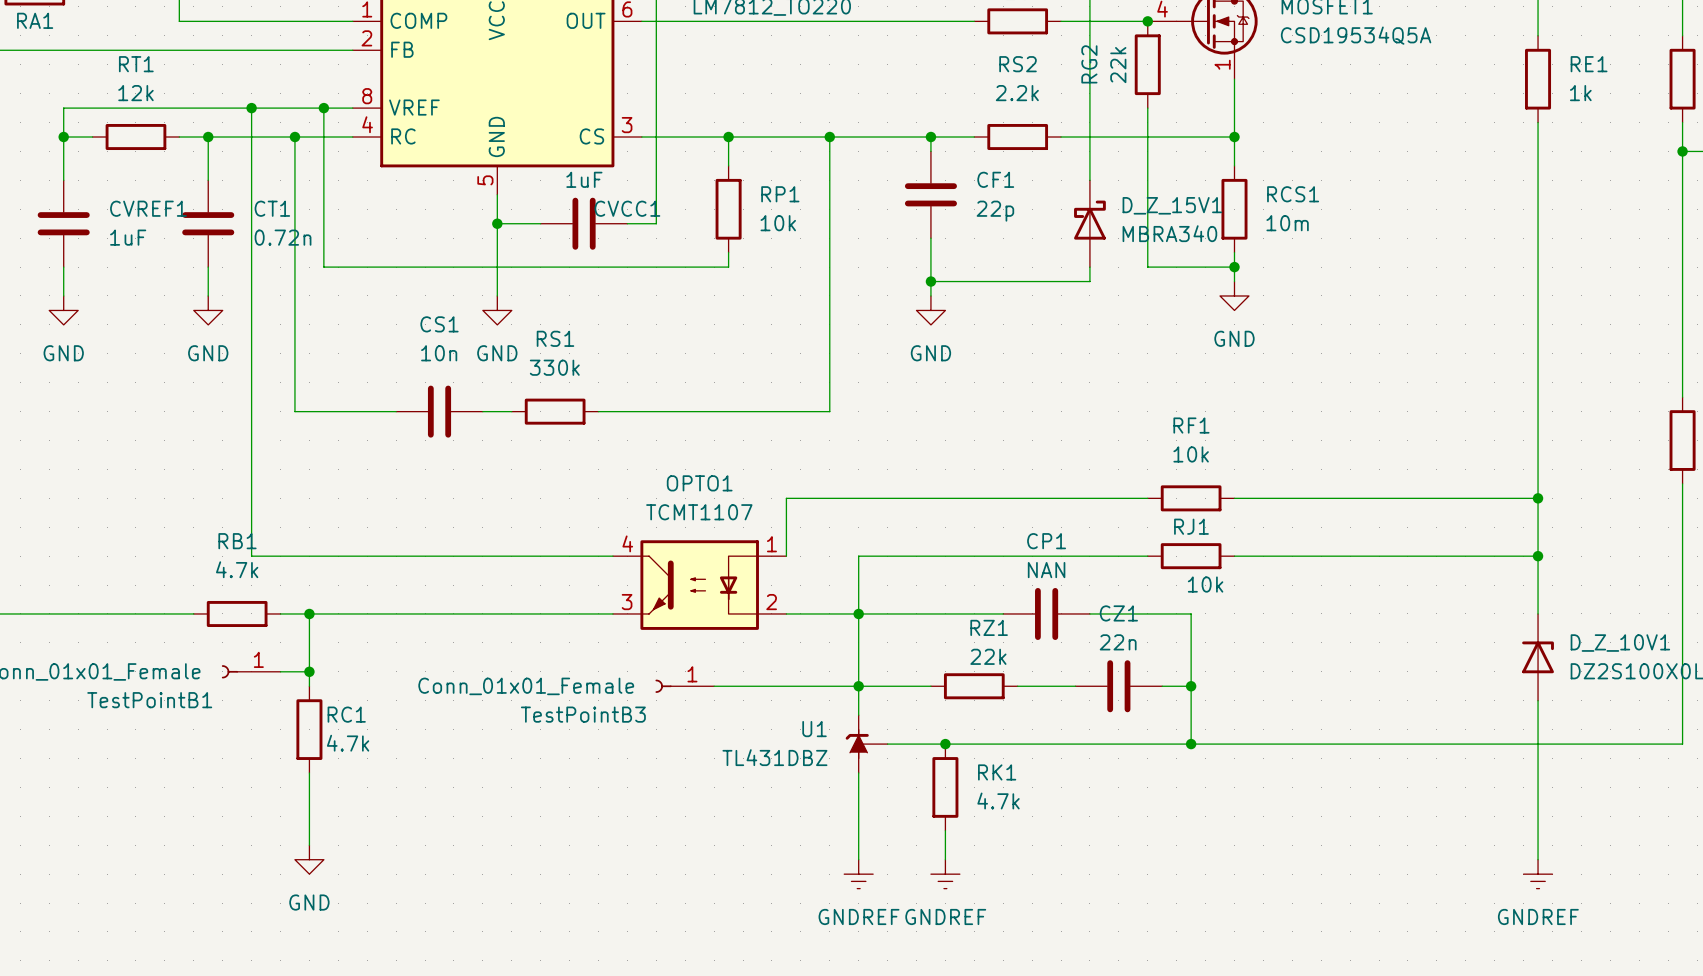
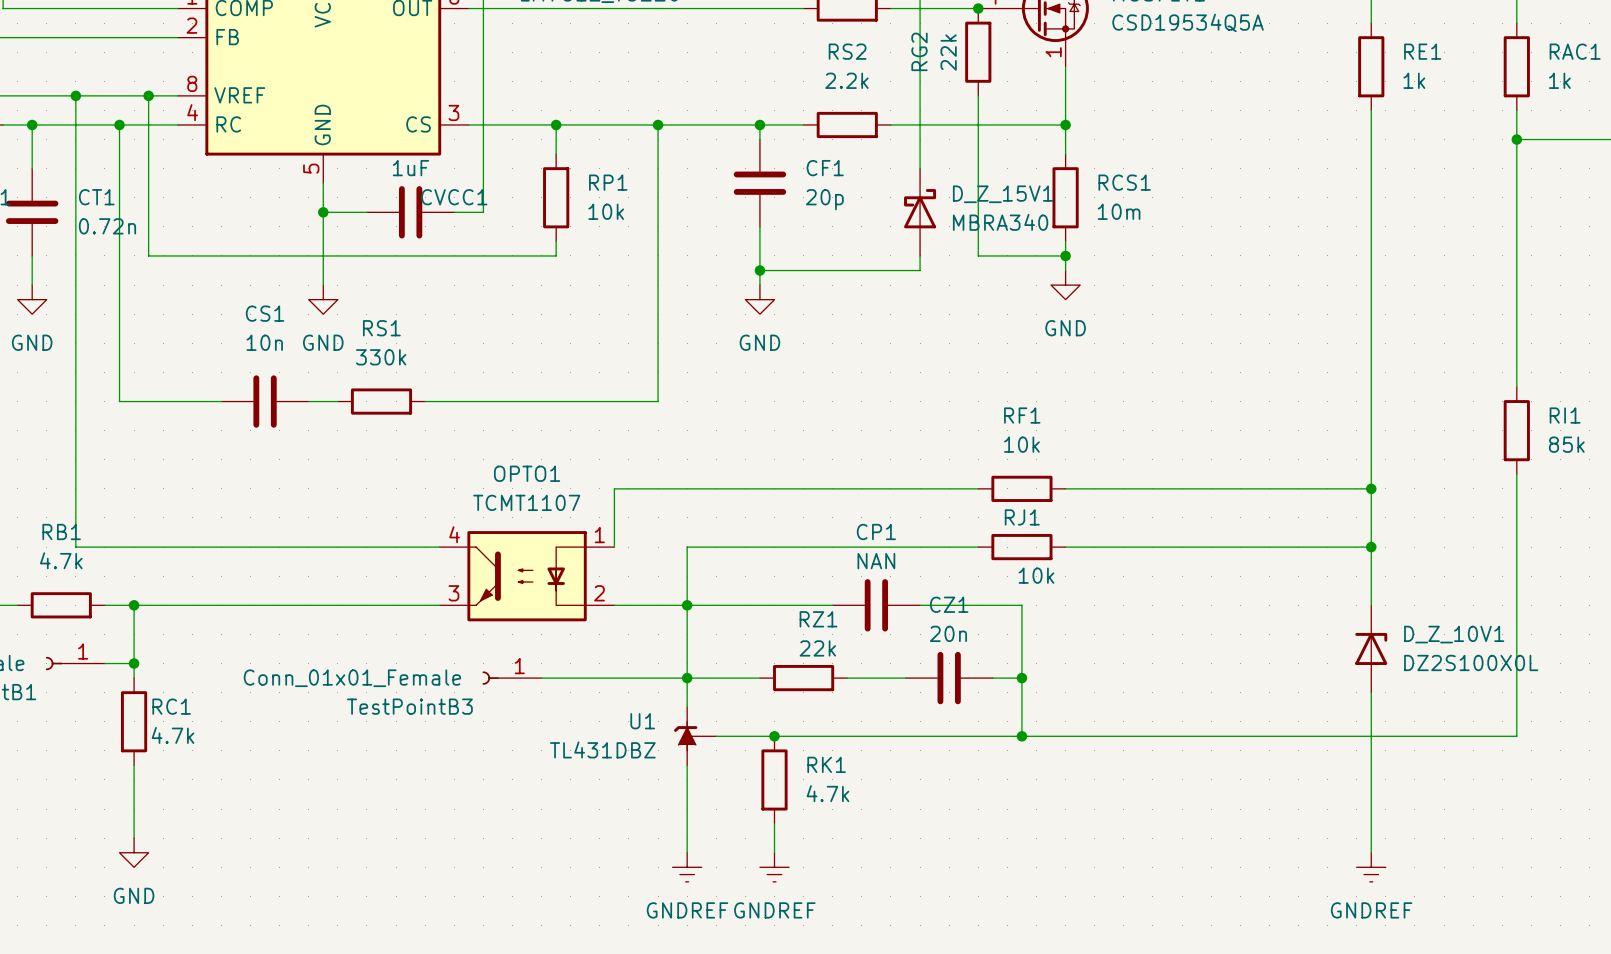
CF1 value: 22p (995, 211) -> 20p (824, 199)
CZ1 value: 22n (1118, 642) -> 20n (948, 633)

